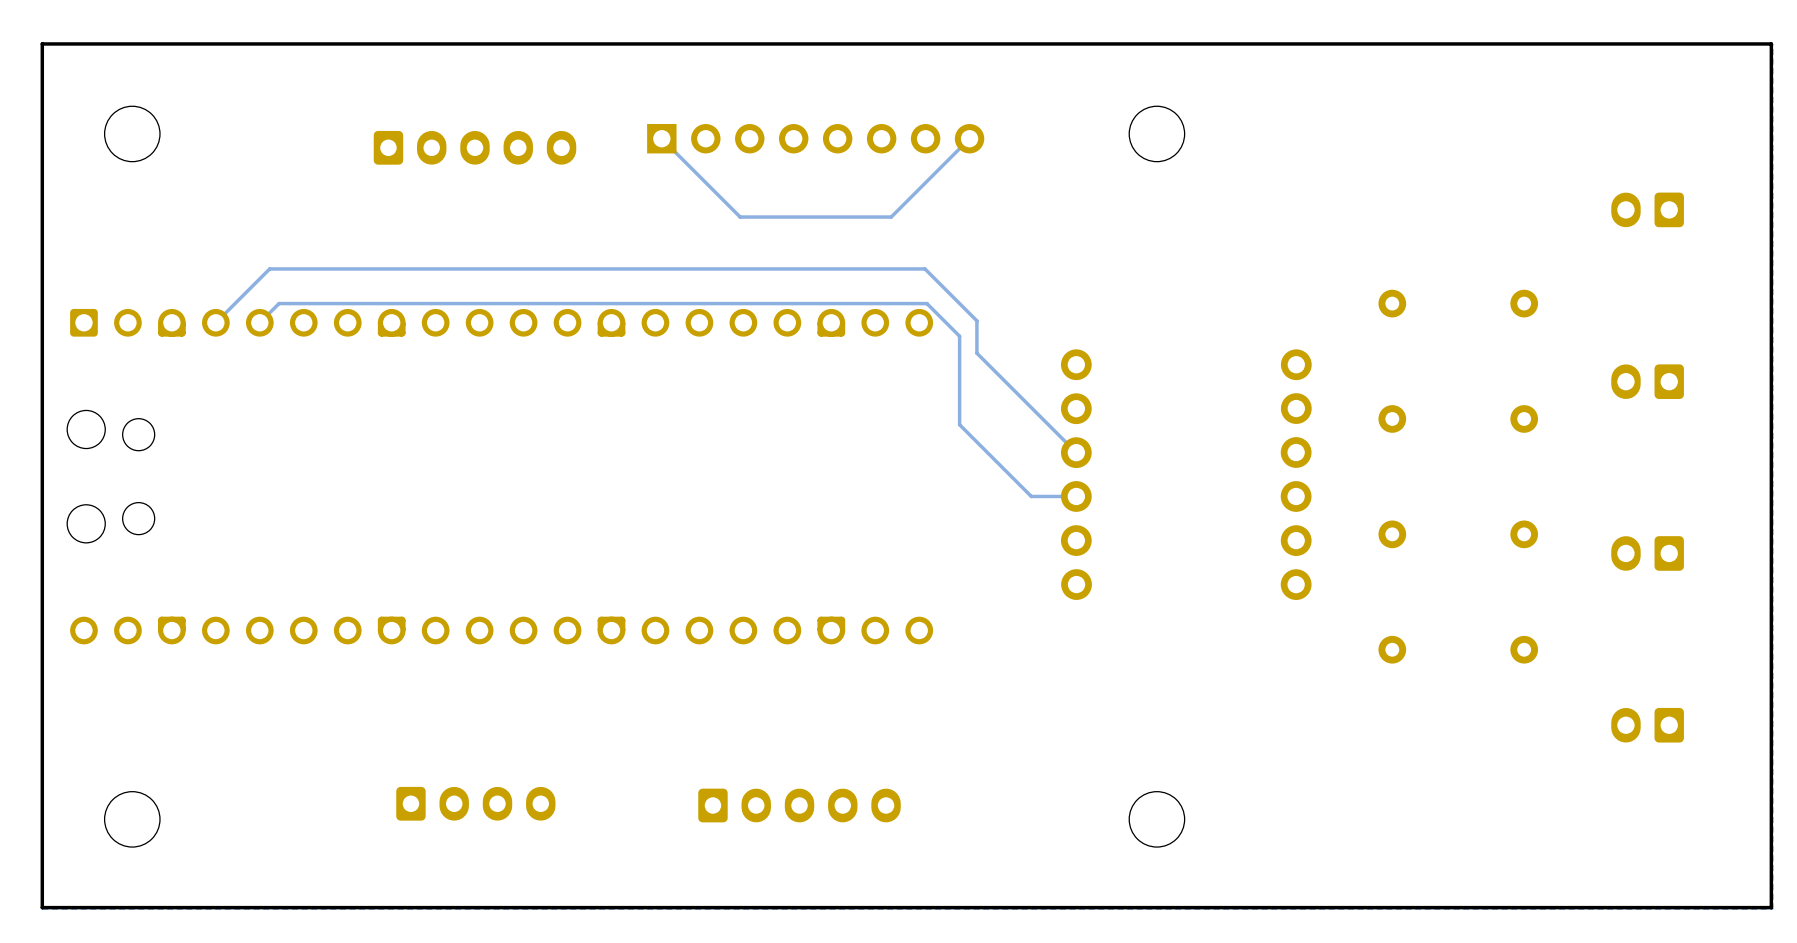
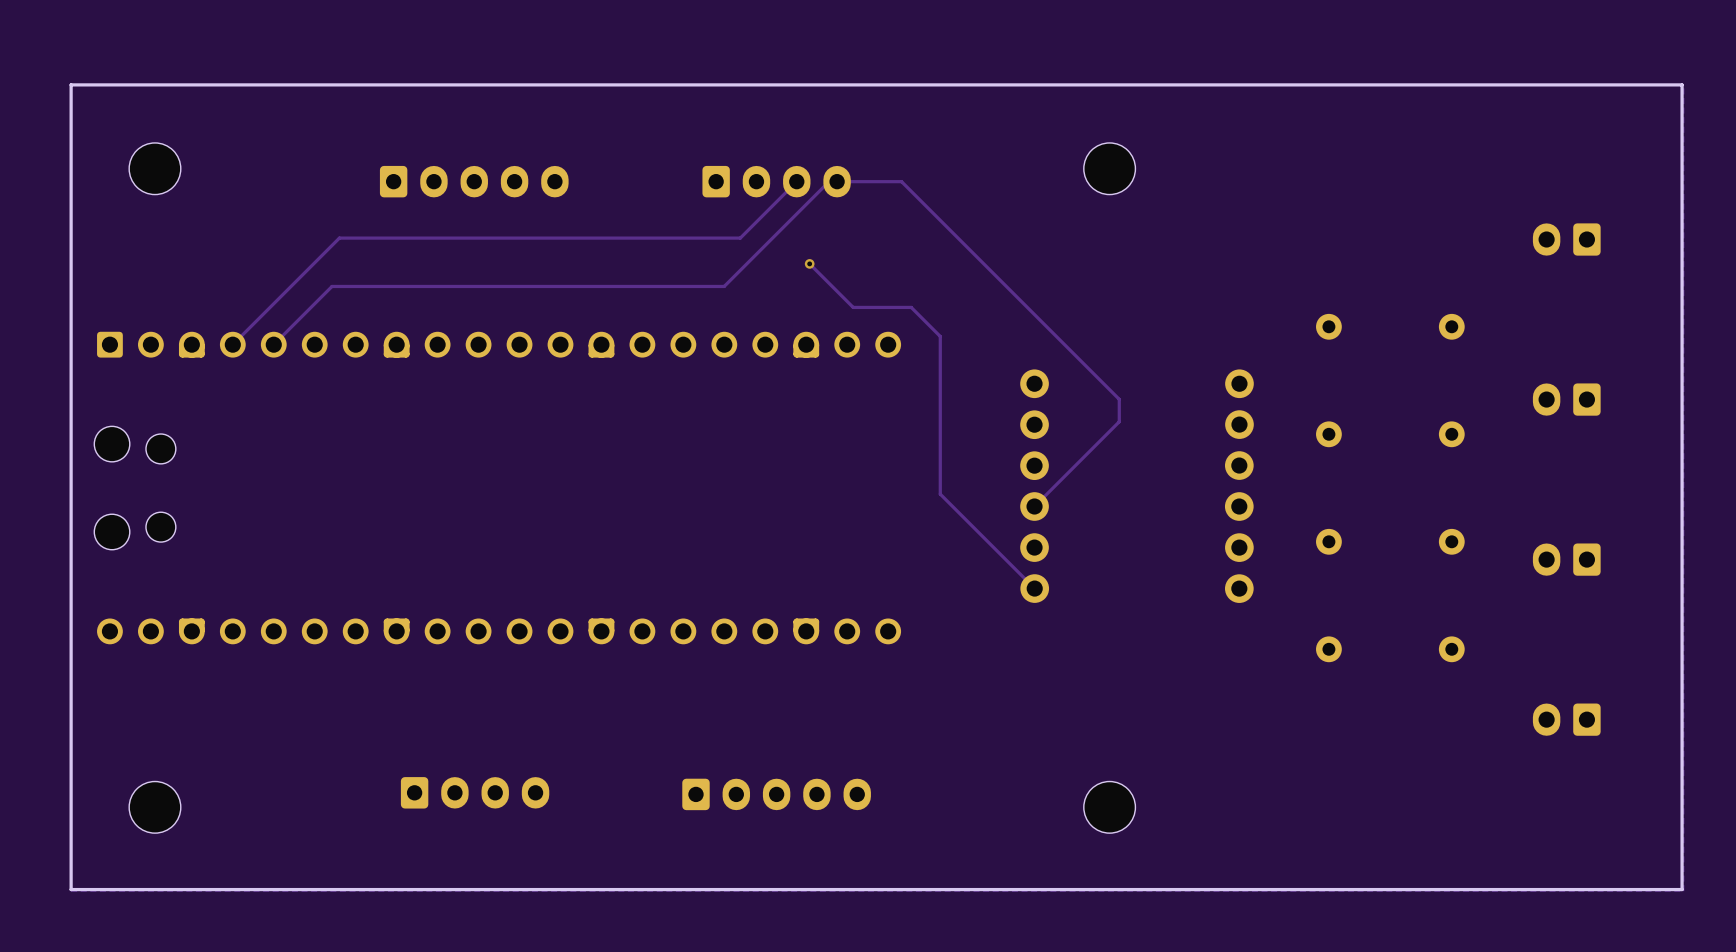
part: (815, 138) -> none
track: (969, 138) (891, 217) (740, 217) (661, 138) -> none
part: none -> (776, 181)
track: none -> (837, 181) (901, 181) (1119, 399) (1119, 421) (1034, 506)
track: none -> (809, 263) (853, 307) (911, 307) (940, 336) (940, 494) (1034, 588)
via: none -> (809, 263)
track: (269, 268) (924, 268) (976, 320) (976, 353) (1076, 452) -> (282, 294) (339, 238) (740, 238) (796, 181)
track: (279, 303) (926, 303) (959, 336) (959, 424) (1031, 496) (1076, 496) -> (291, 326) (331, 286) (724, 286) (829, 181)

